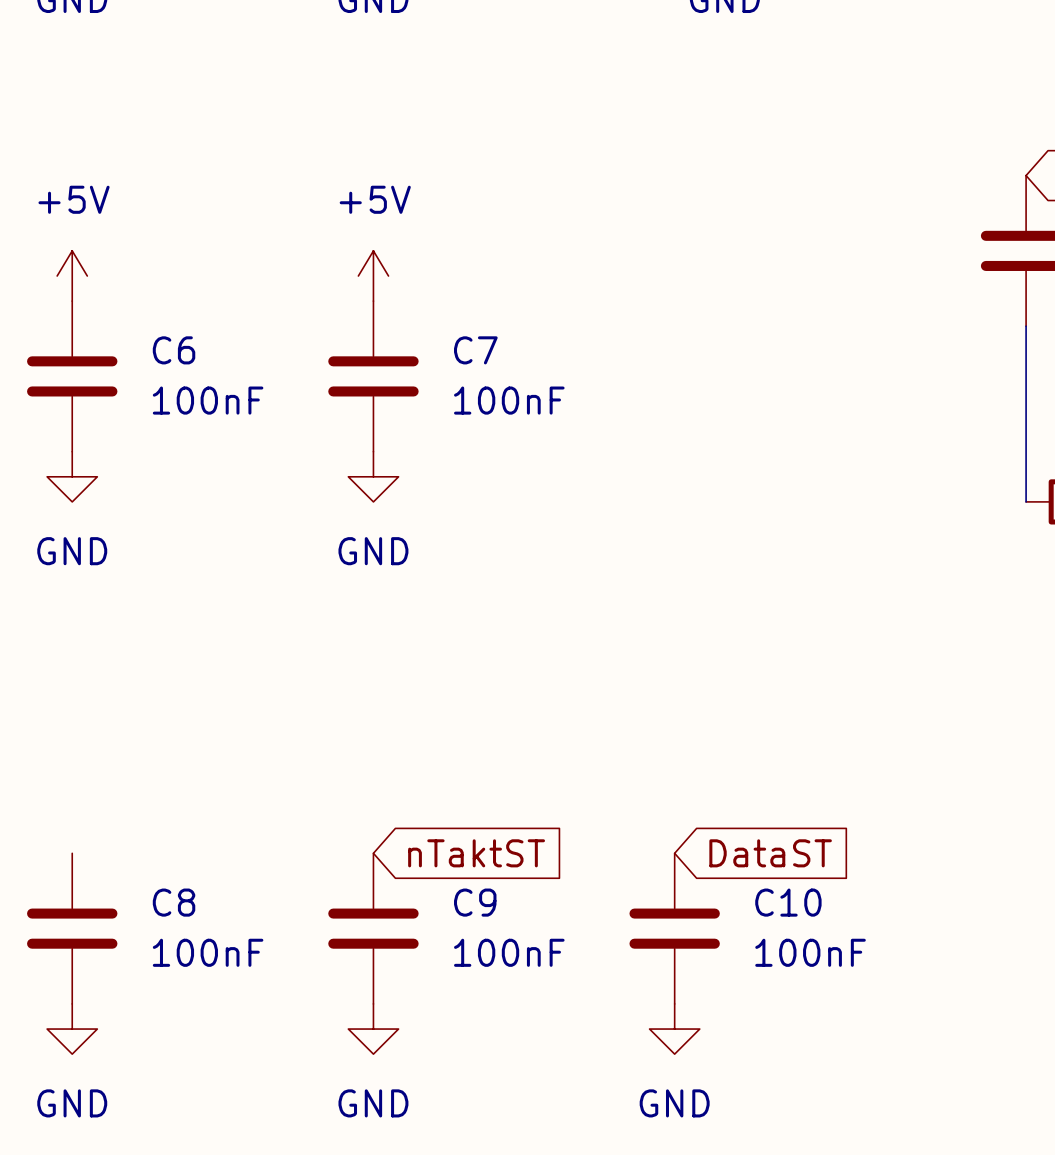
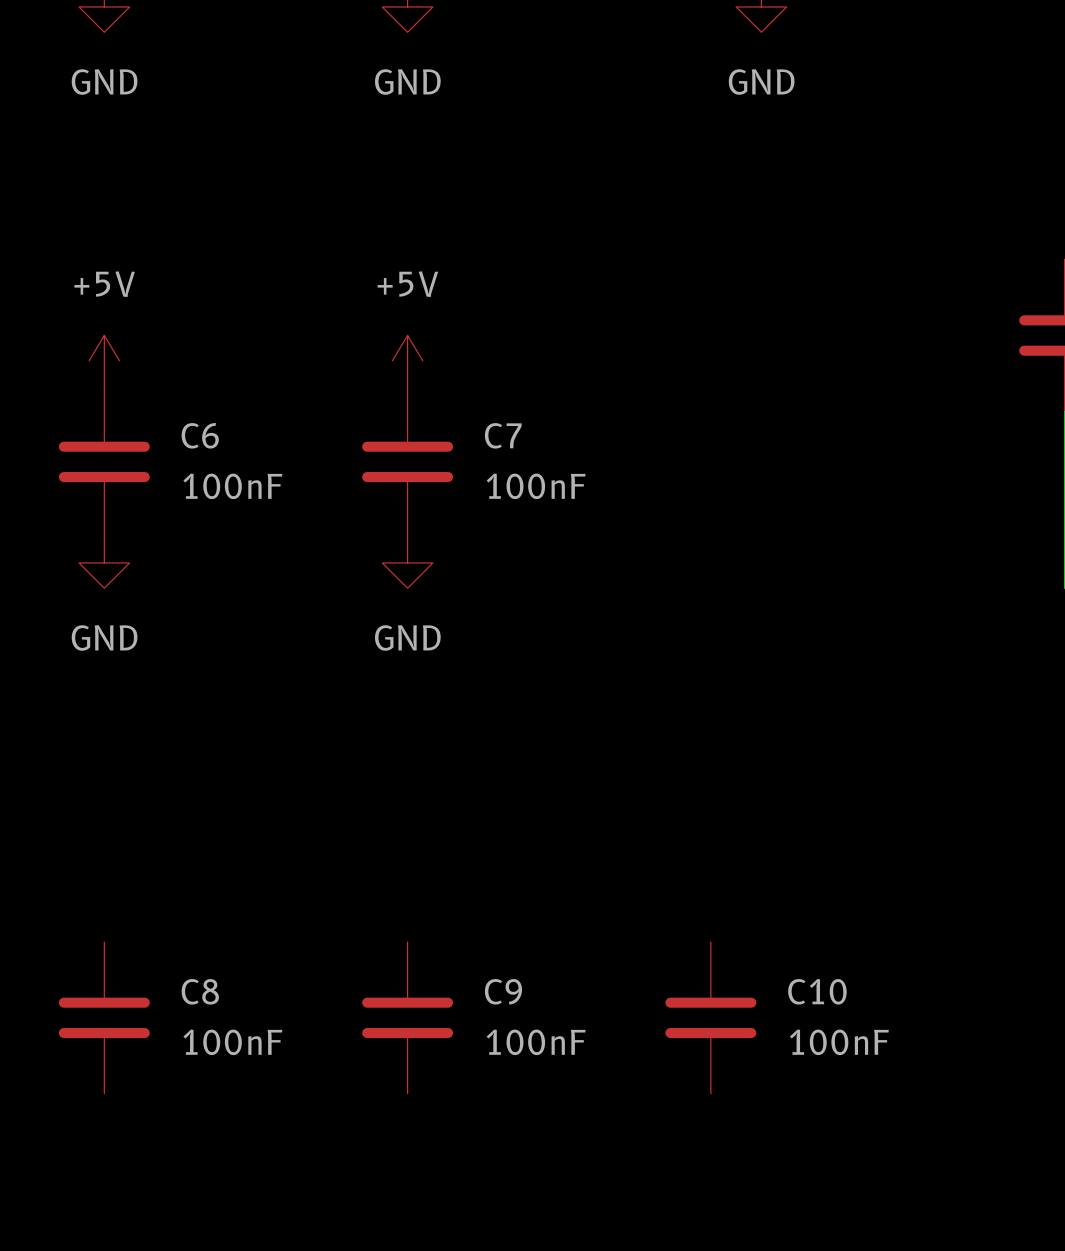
global label: nTaktST (476, 853) -> none
global label: DataST (770, 853) -> none
power symbol: GND (72, 1029) -> none
power symbol: GND (373, 1029) -> none
power symbol: GND (674, 1029) -> none

